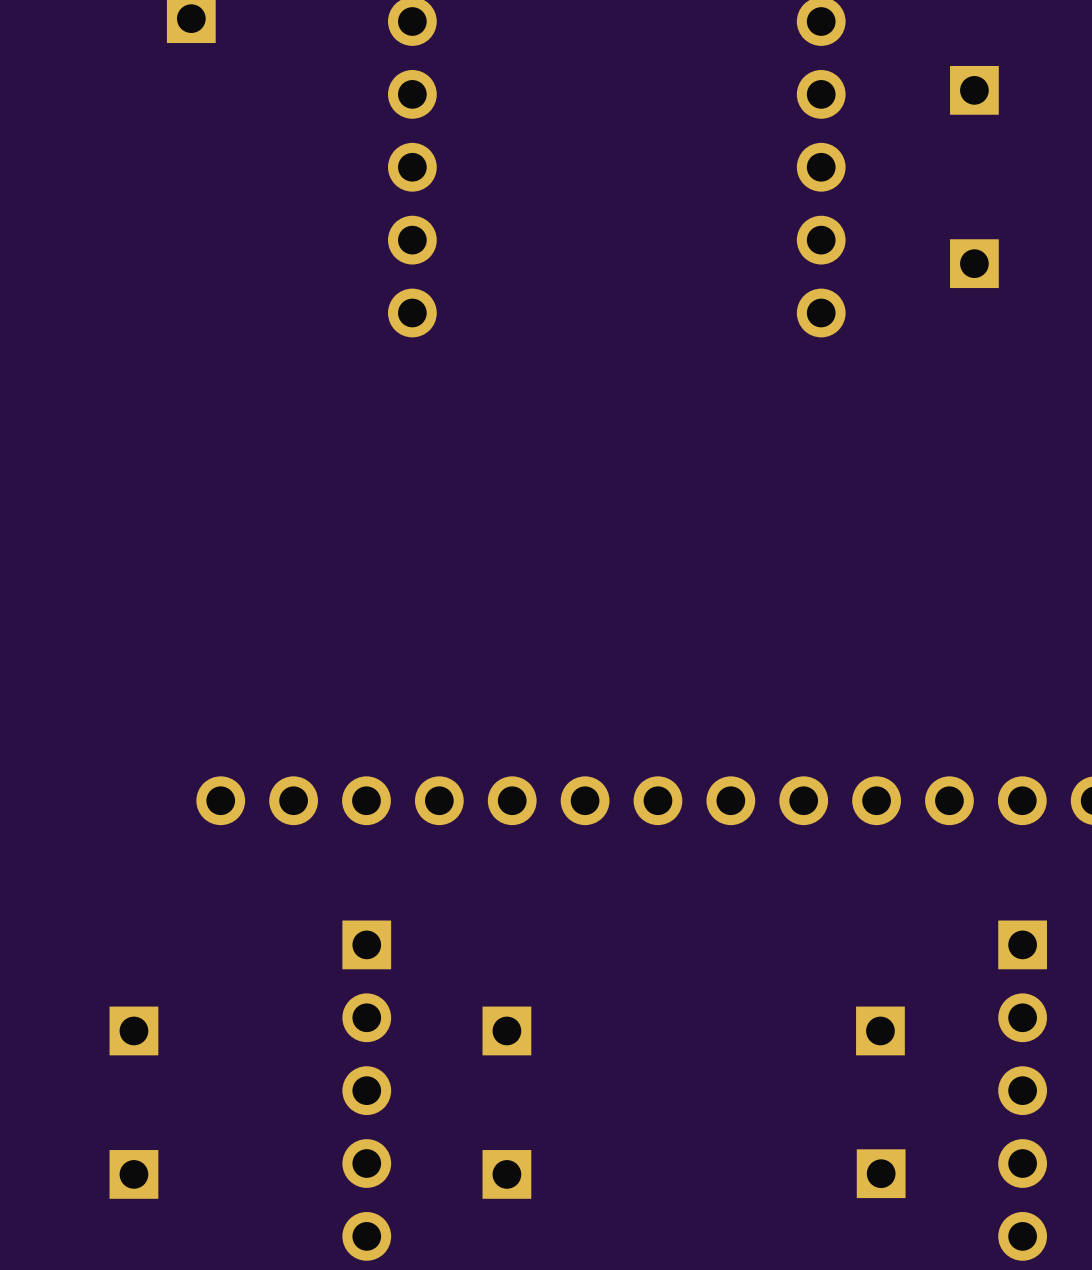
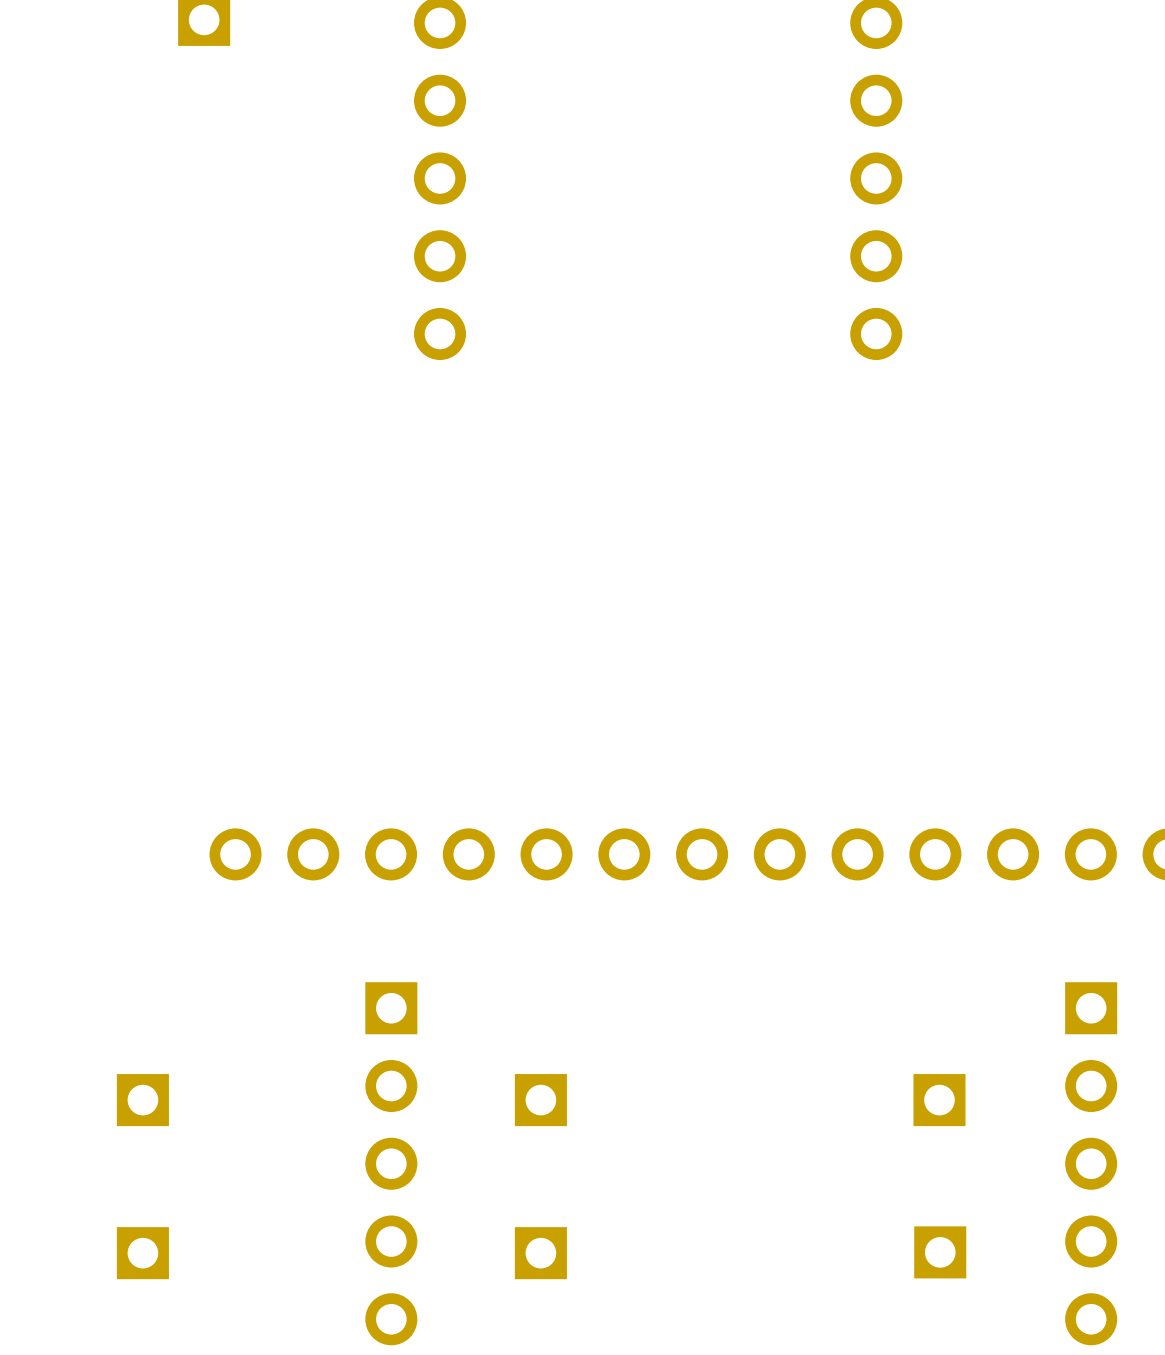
part: (974, 90) -> none
part: (974, 263) -> none

